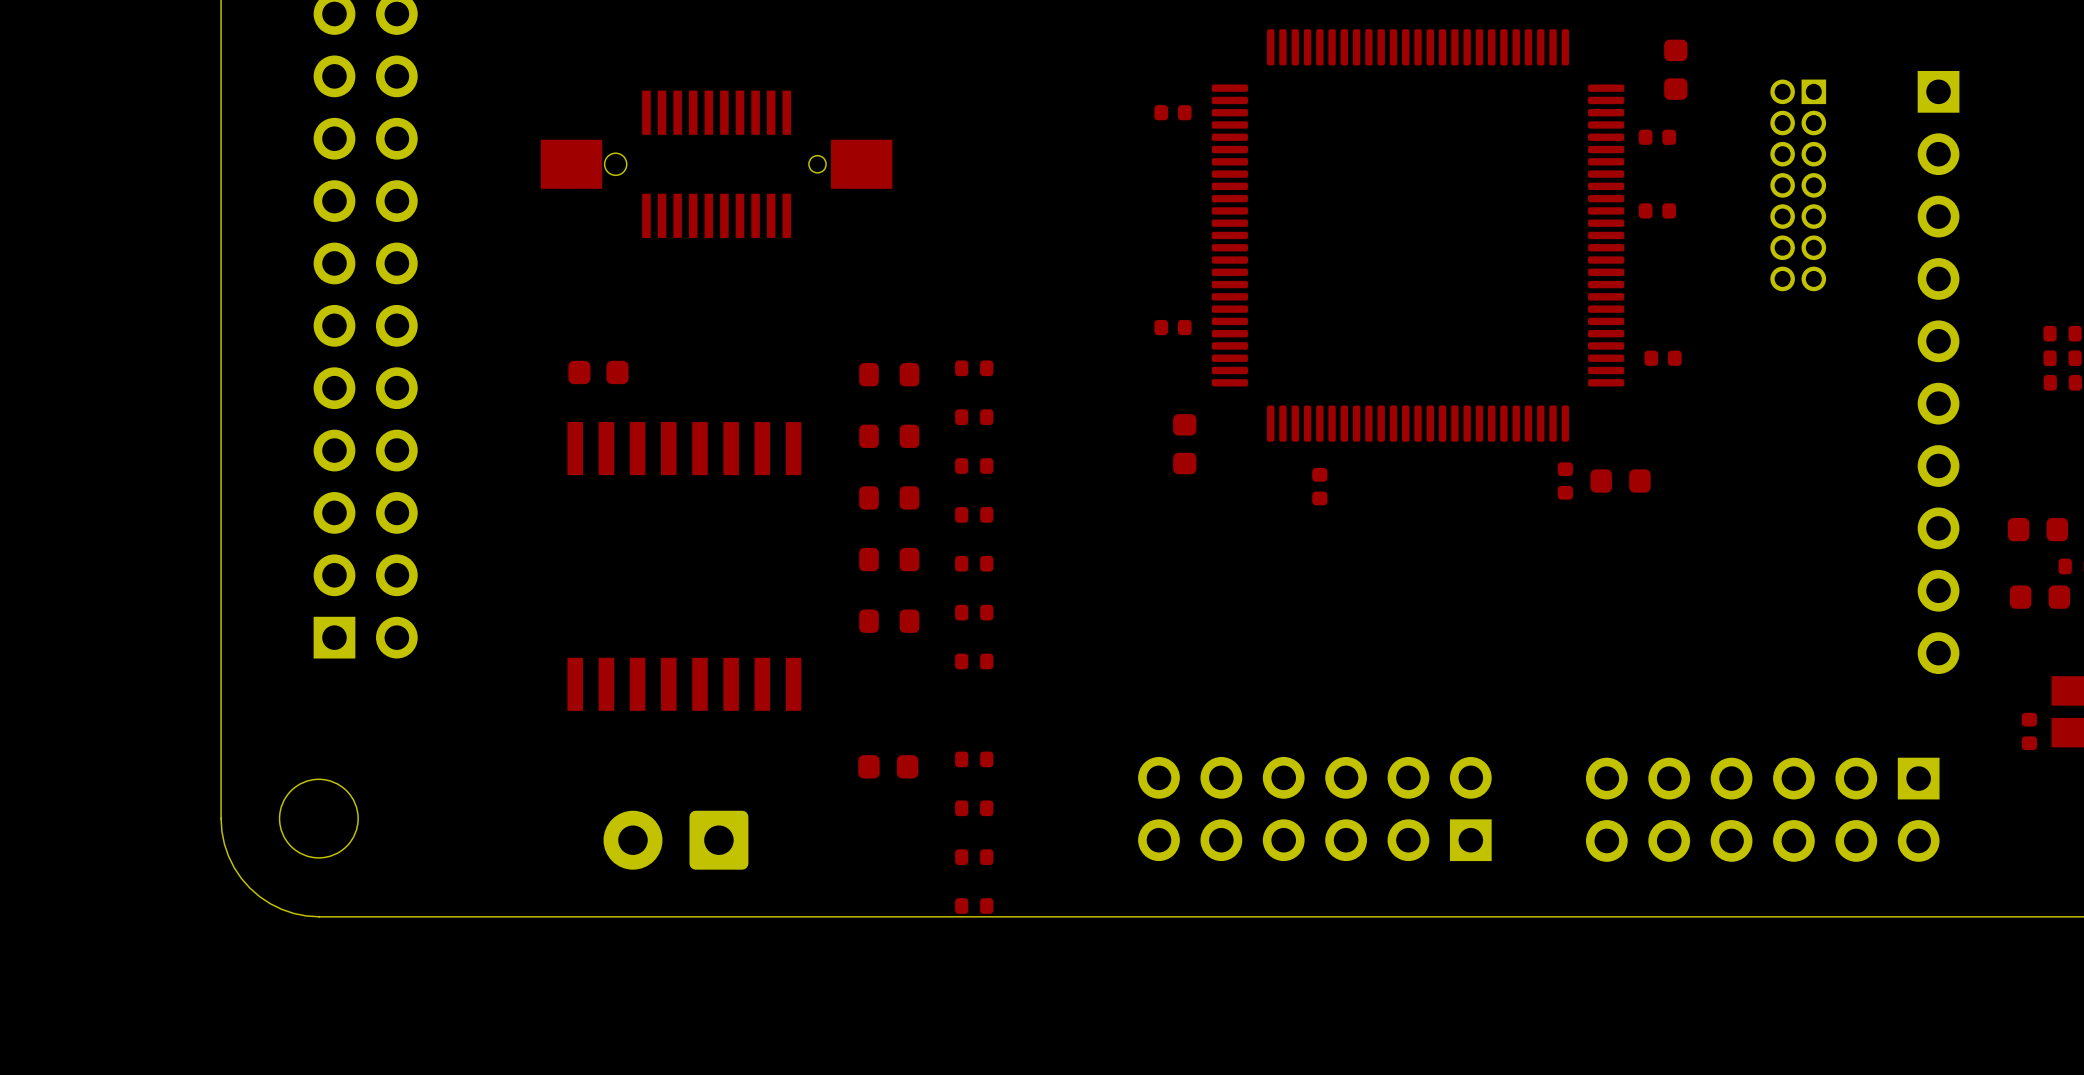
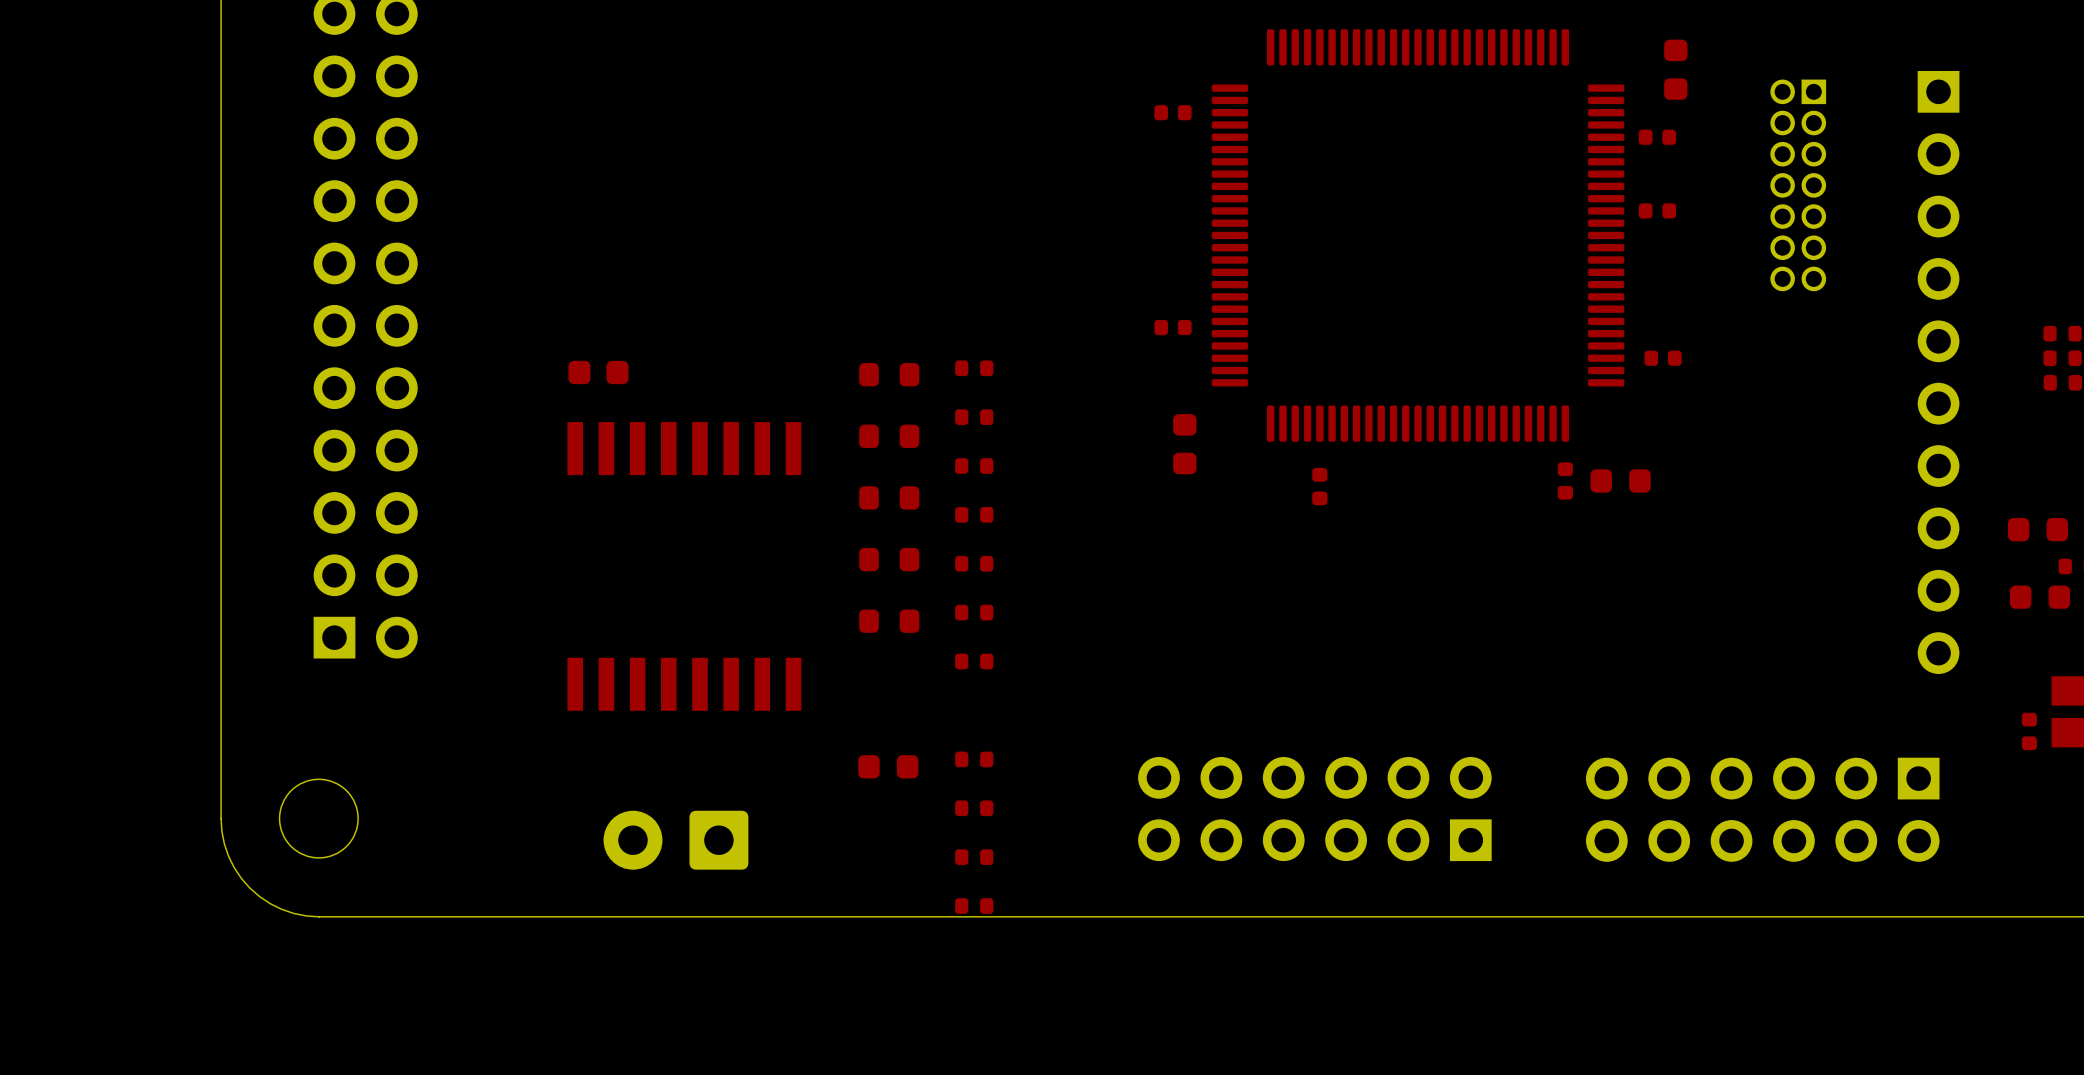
part: (716, 164) -> none

